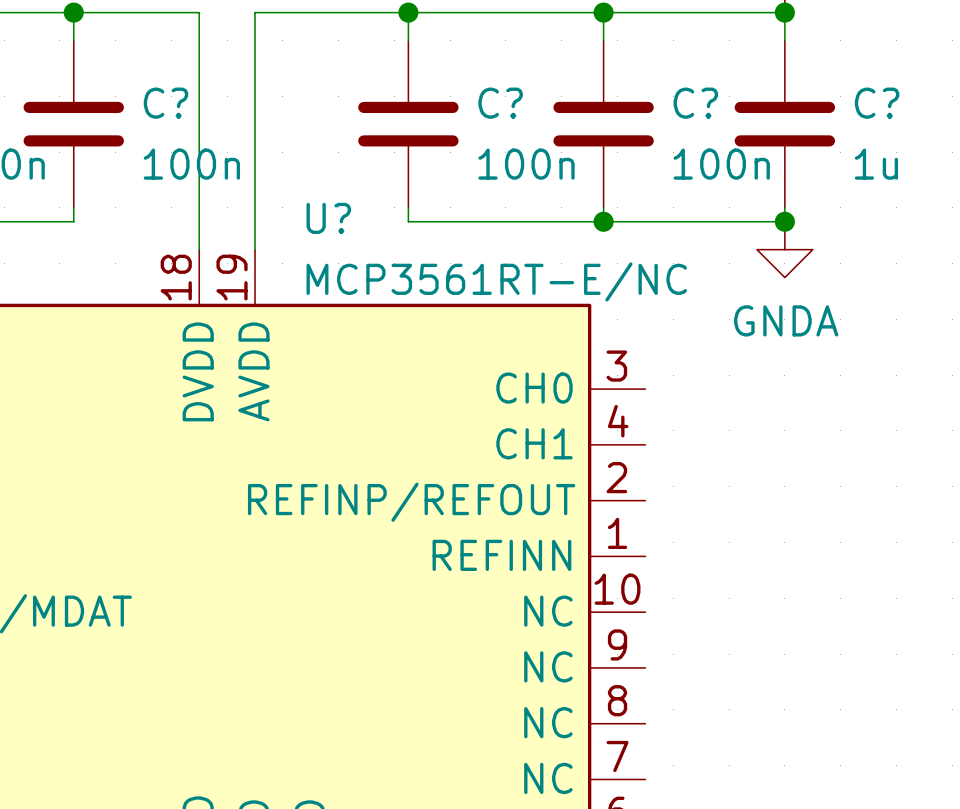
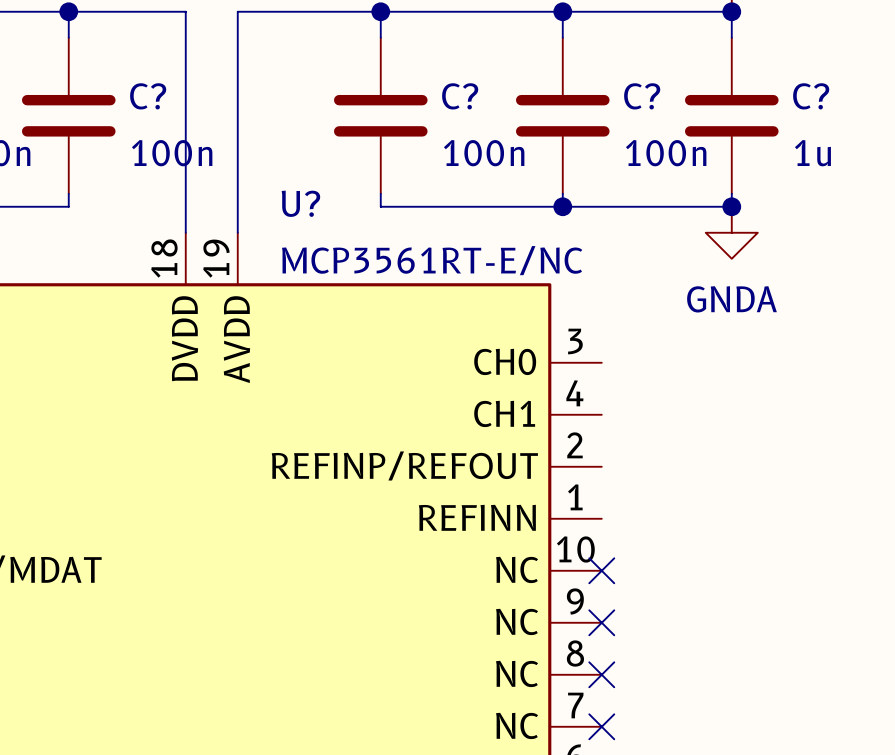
no-connect mark: none -> (601, 570)
no-connect mark: none -> (601, 622)
no-connect mark: none -> (601, 674)
no-connect mark: none -> (601, 726)

